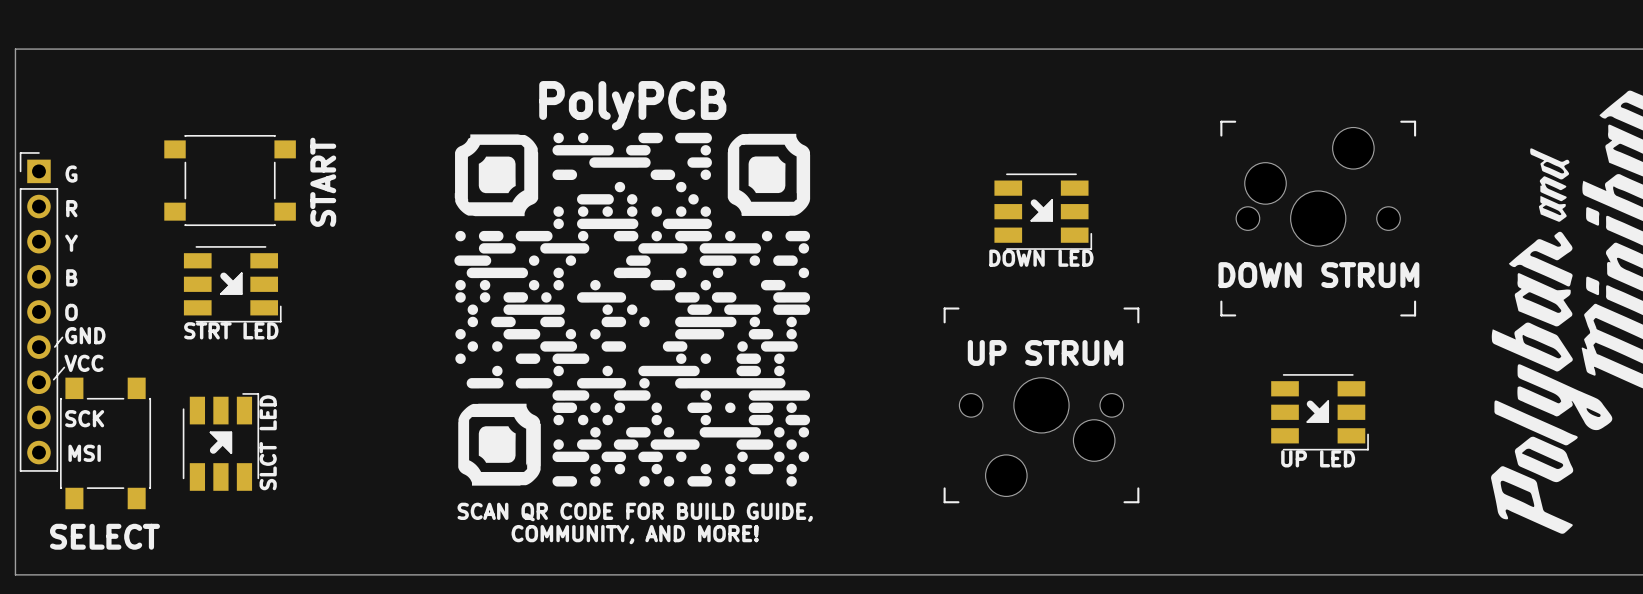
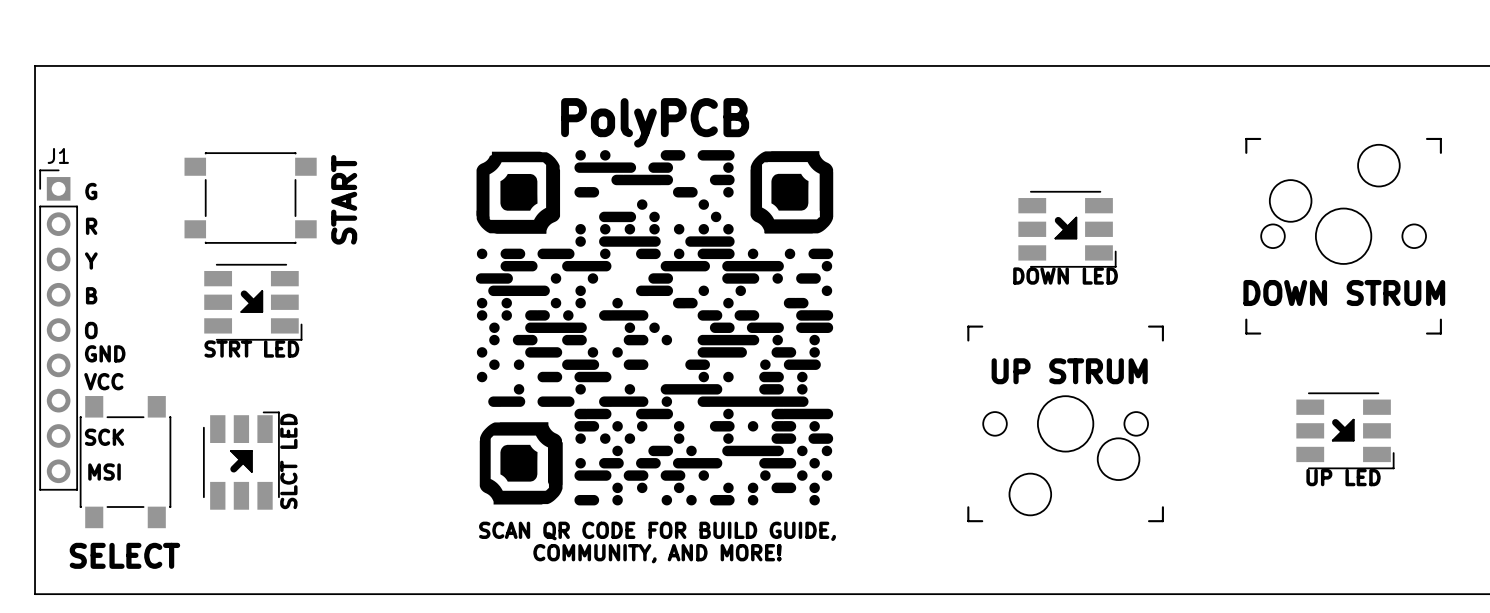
J1 name: none -> J1 (58, 155)
line: (62, 337) (54, 346) -> none
line: (64, 367) (53, 379) -> none

